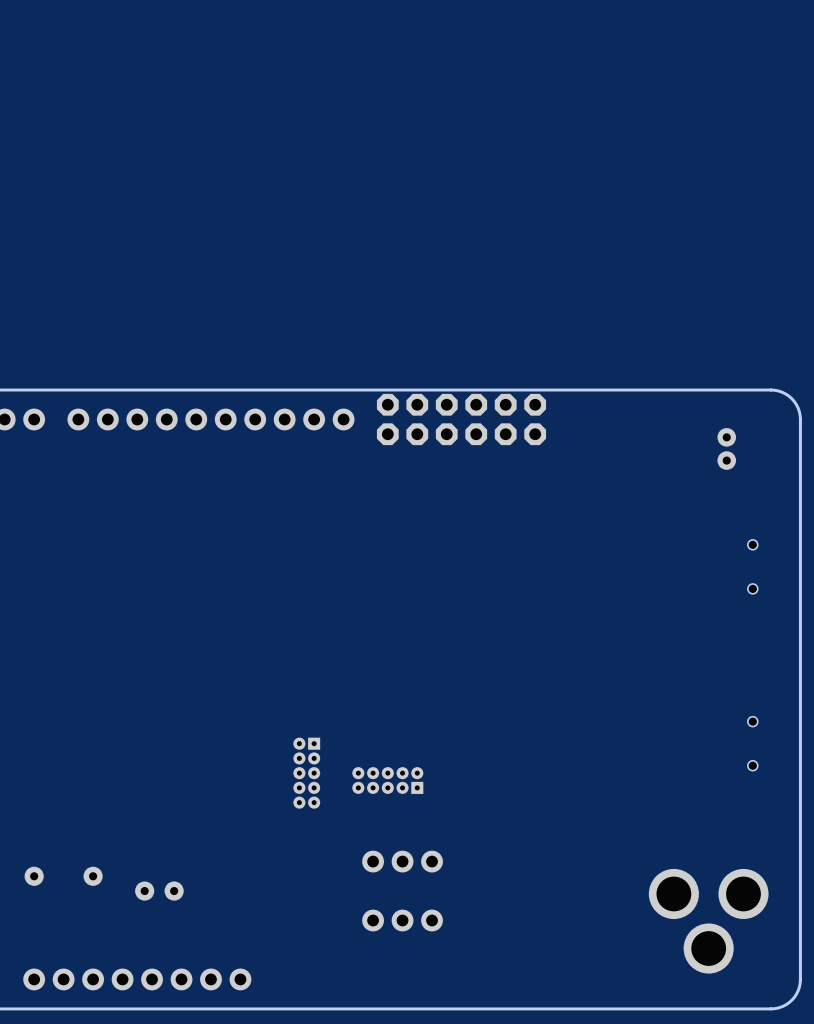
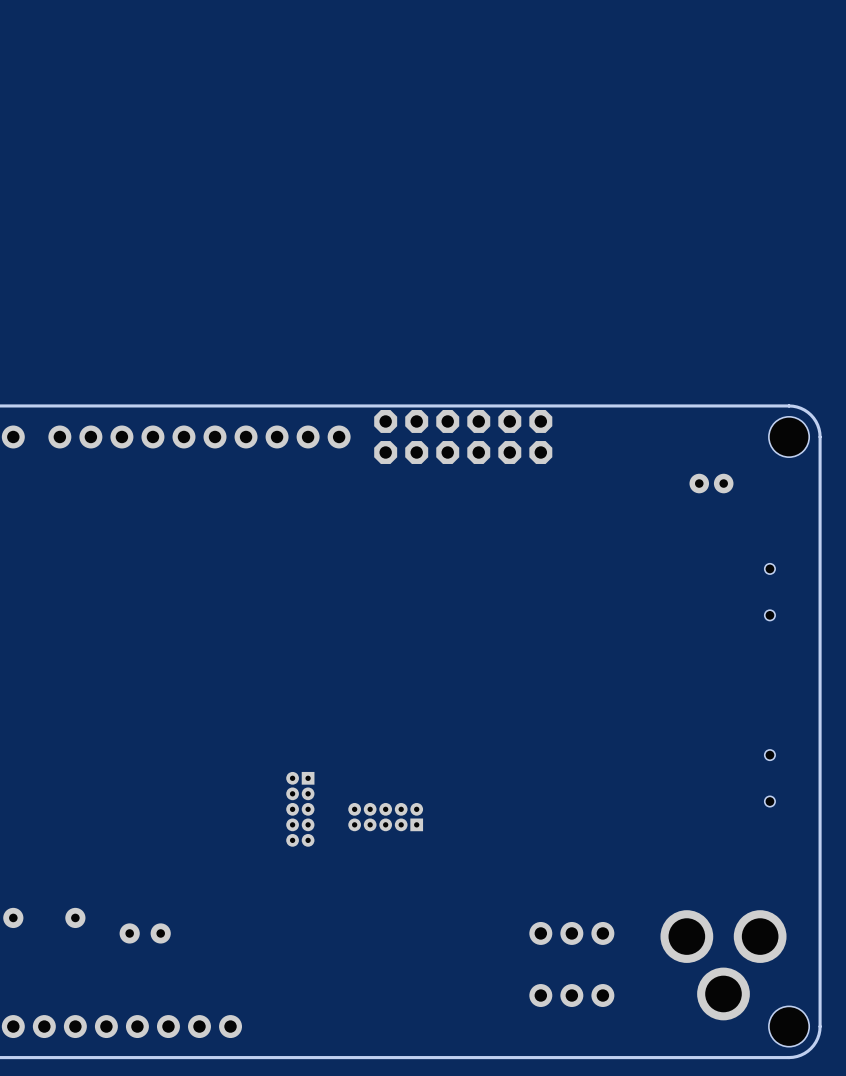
part: none -> (789, 436)
part rotation: 0° (726, 448) -> 90° clockwise (711, 483)
part position: (726, 448) -> (711, 483)
part: (402, 861) -> none
part: none -> (571, 933)
part: (402, 920) -> none
part: none -> (571, 995)
part: none -> (789, 1026)

